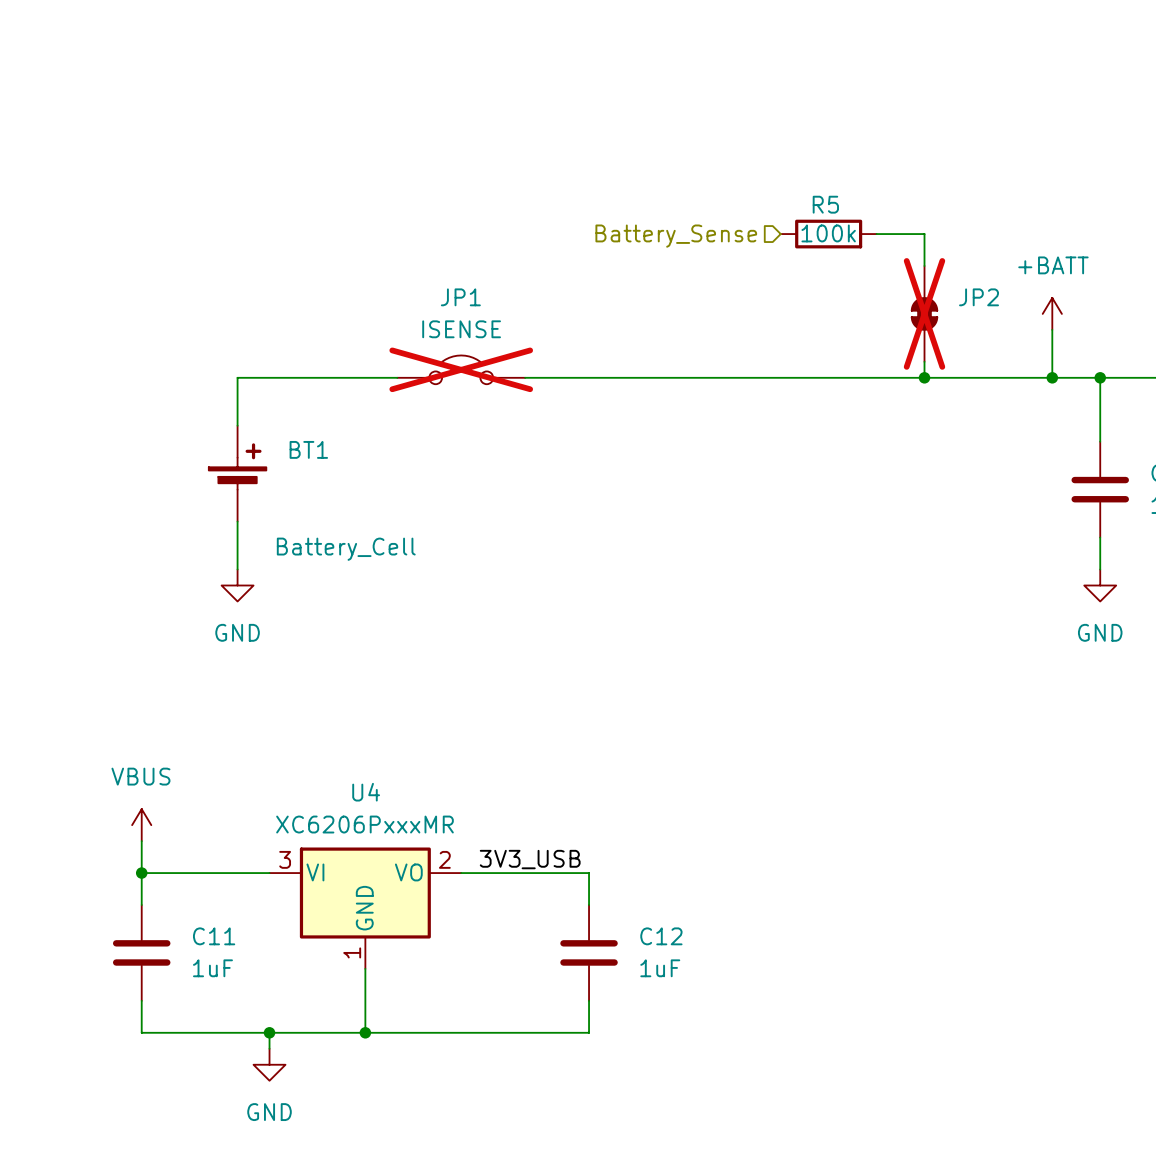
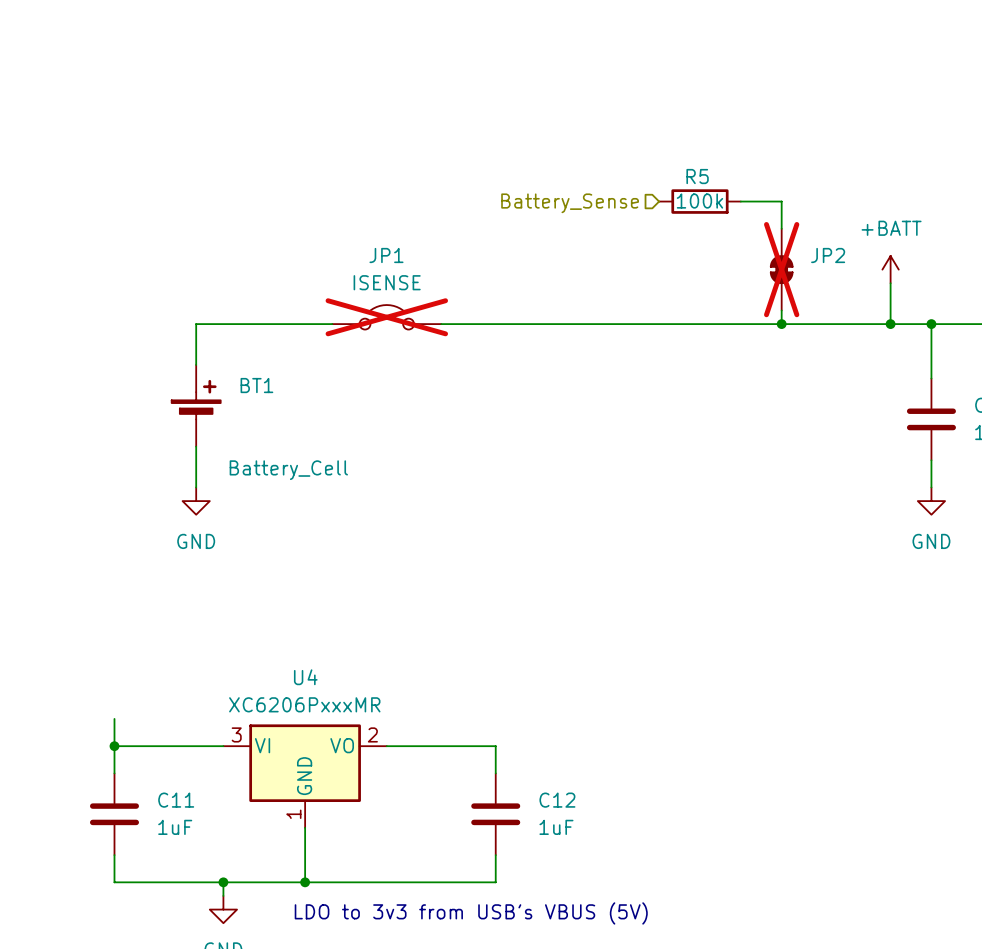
power symbol: VBUS (141, 825) -> none
label: 3V3_USB (530, 859) -> none
text: none -> LDO to 3v3 from USB's VBUS (5V) (471, 913)

